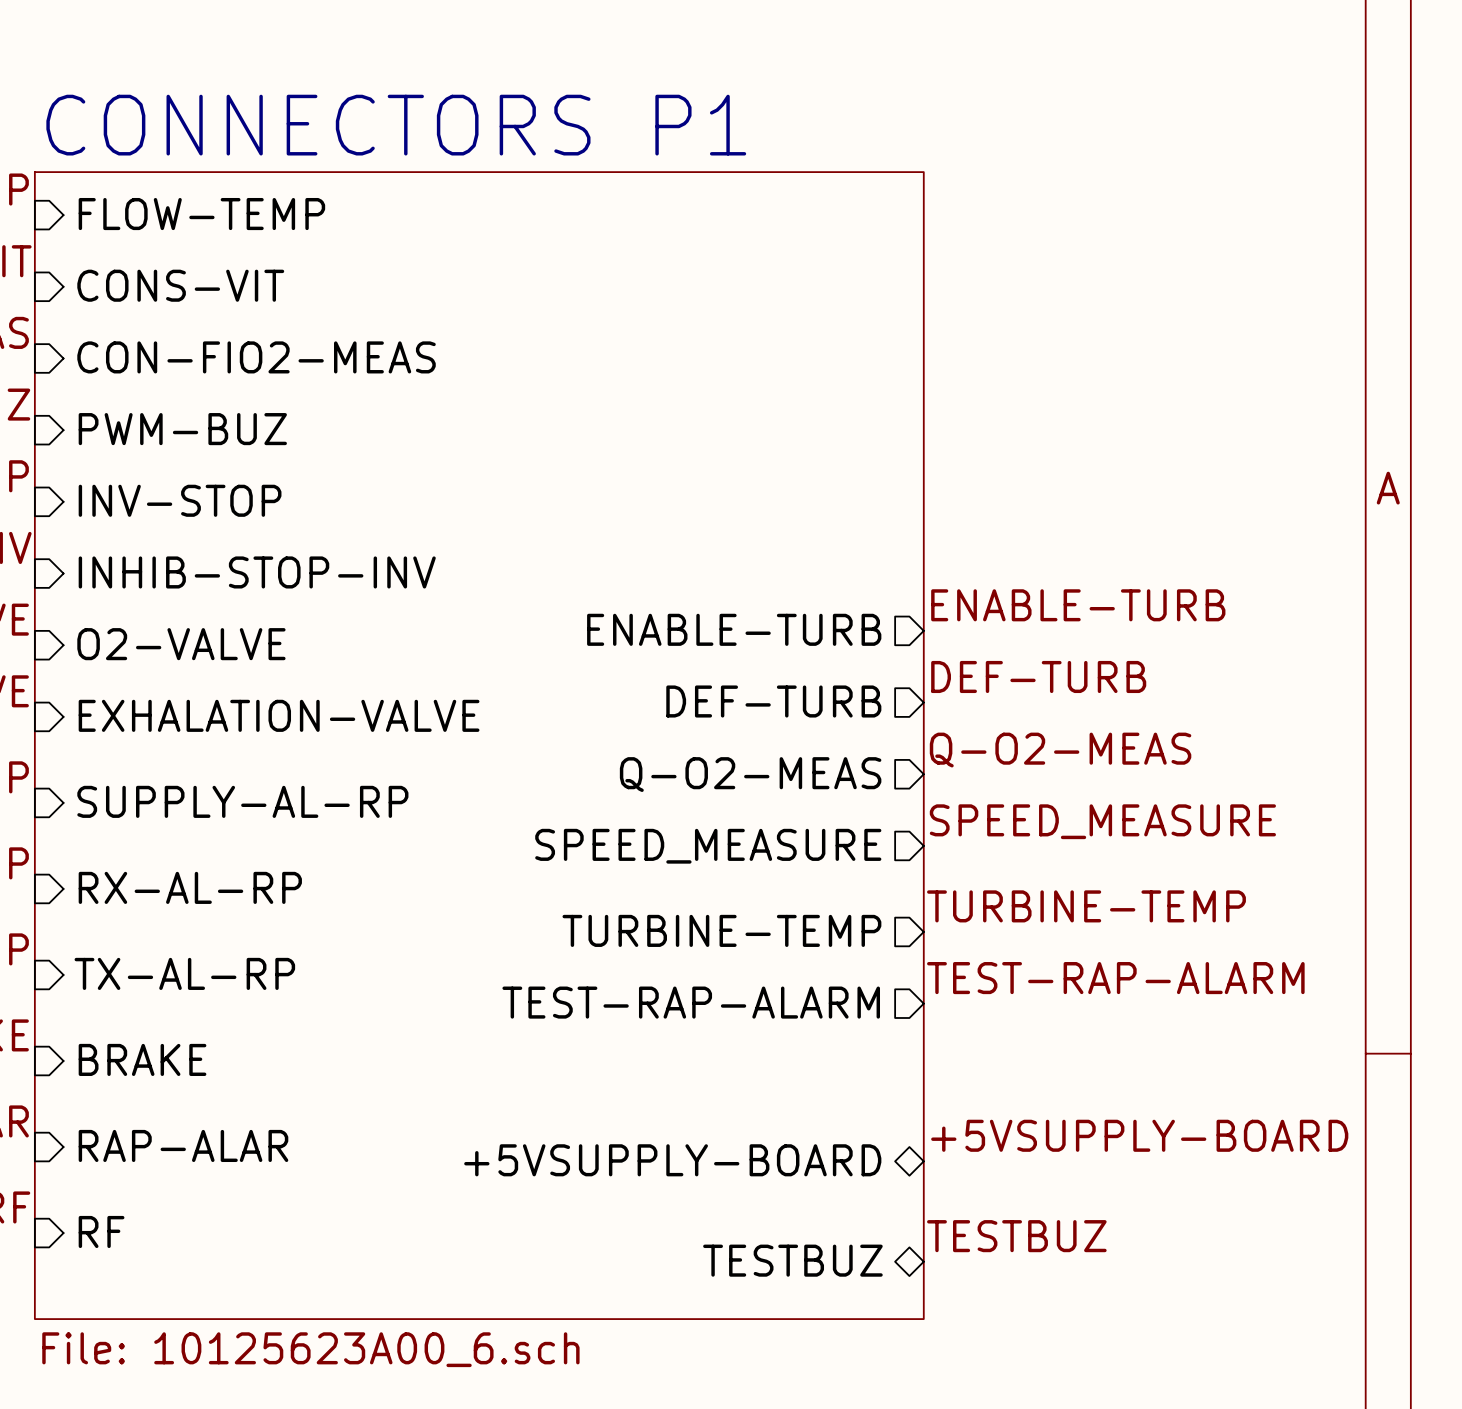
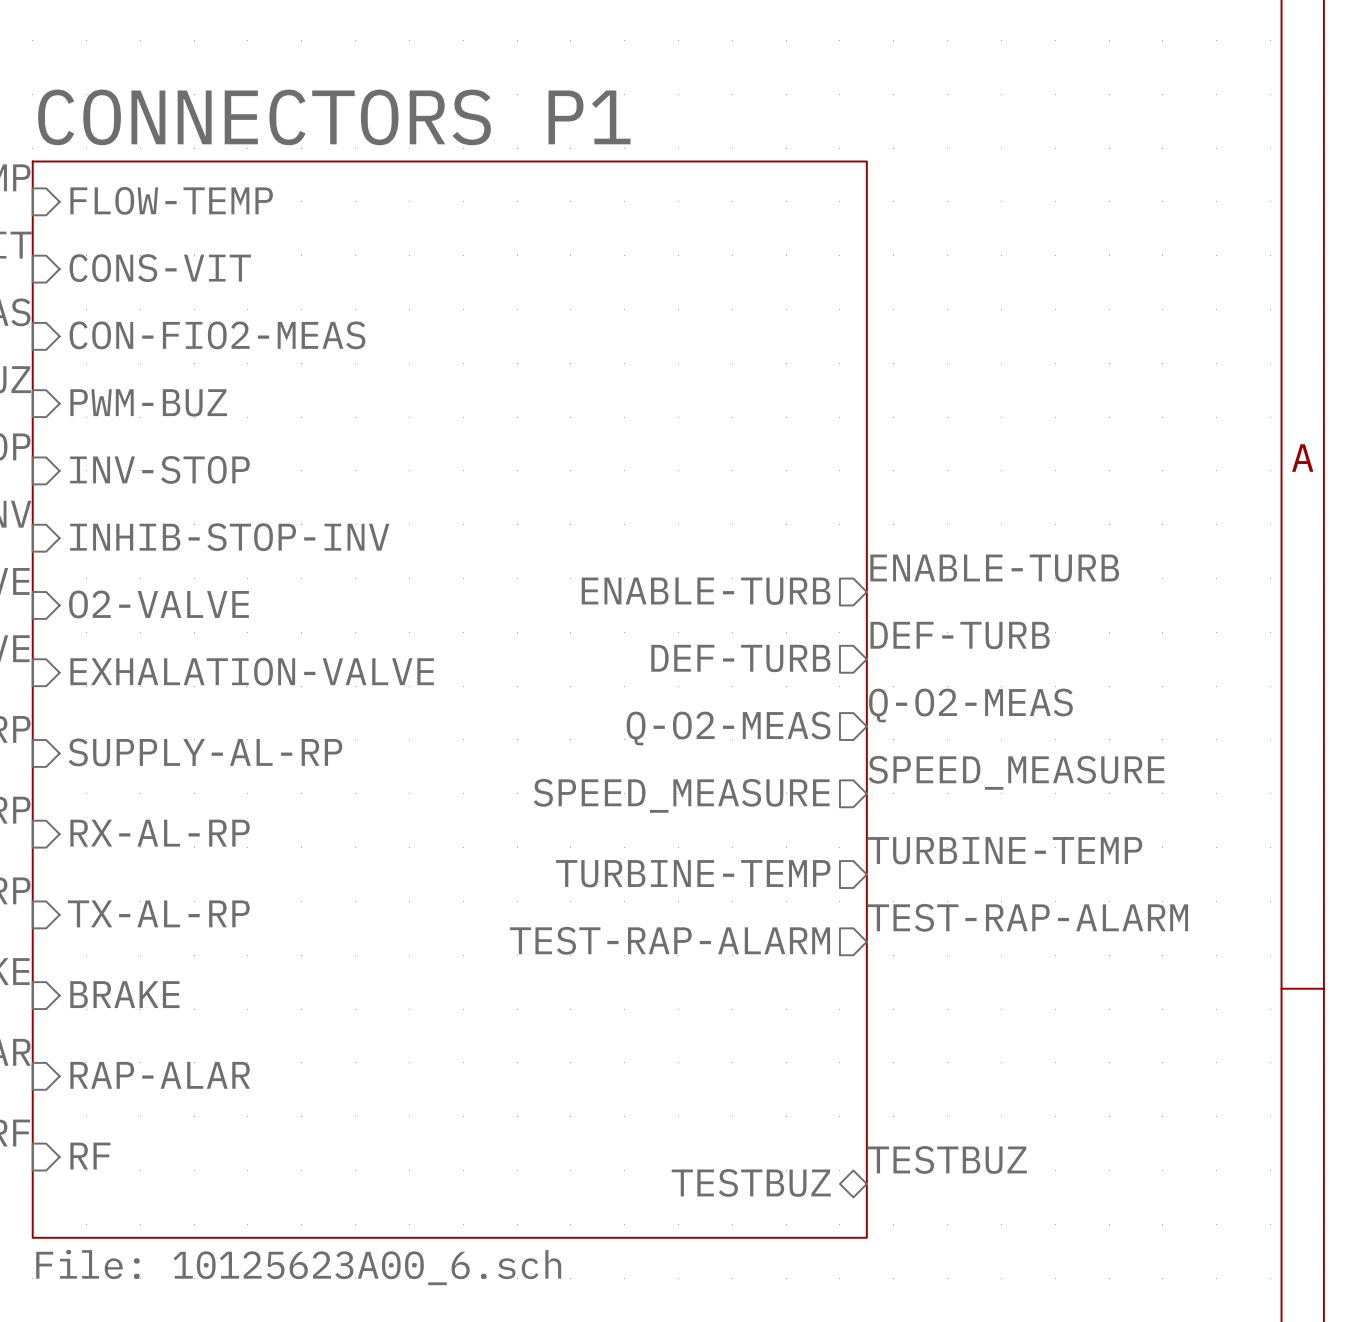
label: +5VSUPPLY-BOARD (1139, 1135) -> none
sheet pin: +5VSUPPLY-BOARD (672, 1160) -> none

